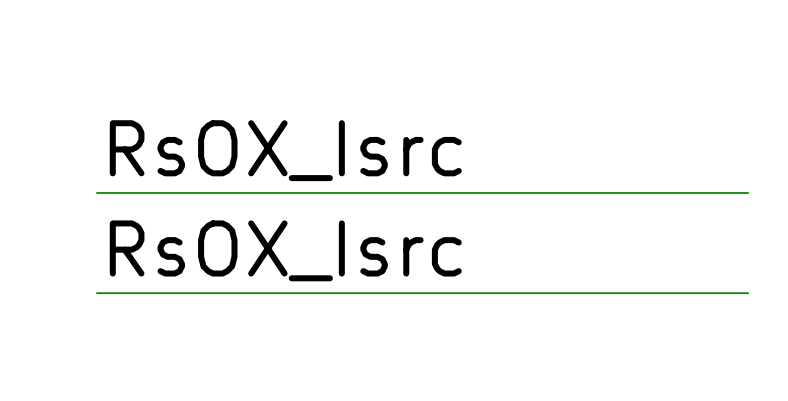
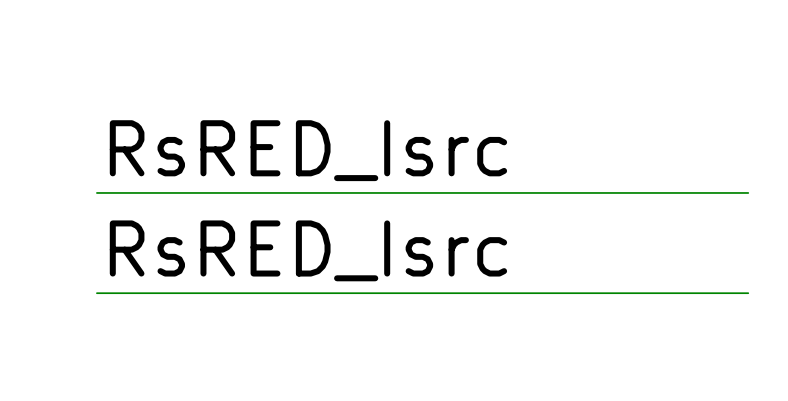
label: RsOX_Isrc (285, 150) -> RsRED_Isrc (308, 150)
label: RsOX_Isrc (285, 250) -> RsRED_Isrc (308, 250)

